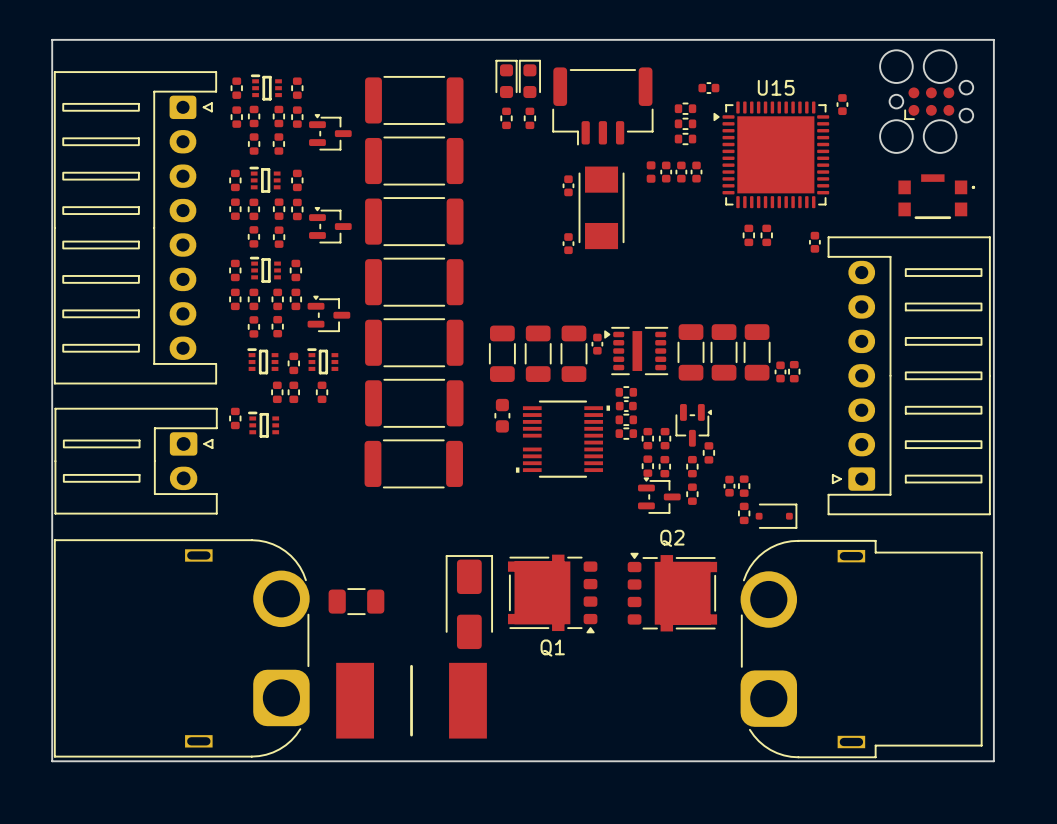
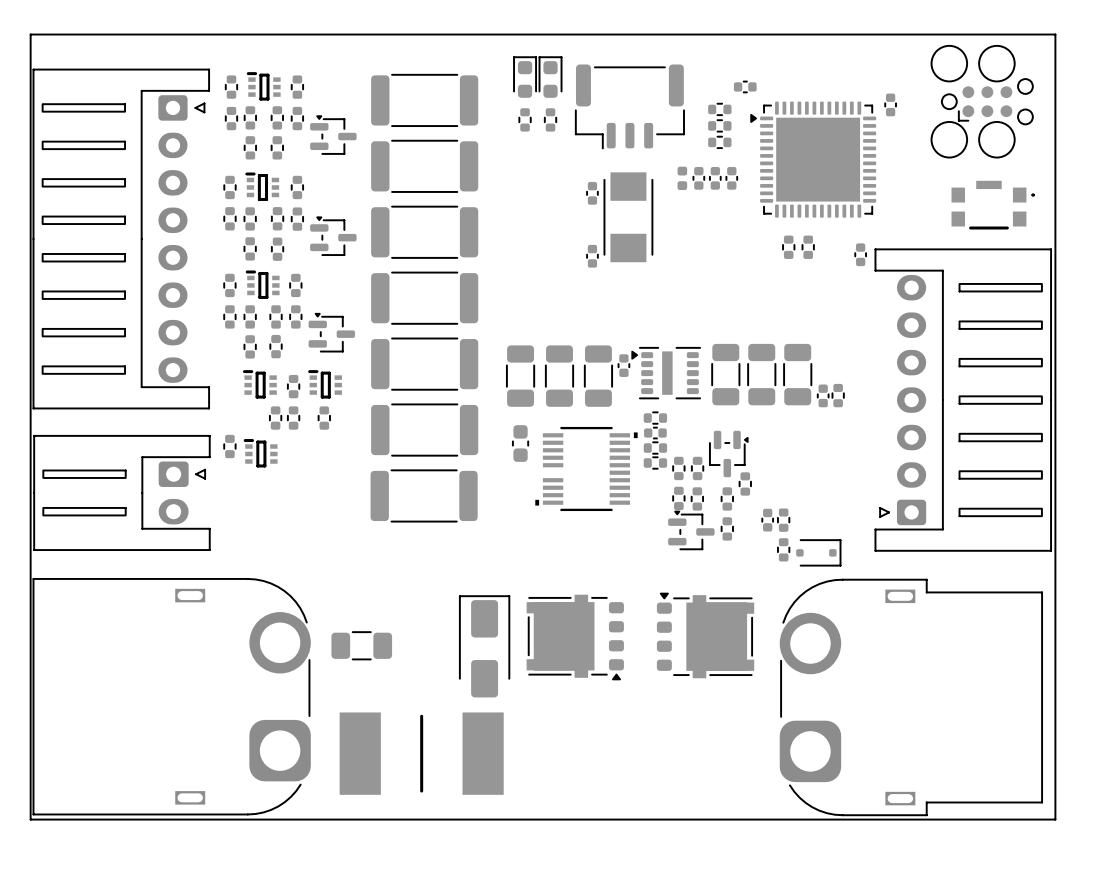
U15 name: U15 (776, 87) -> none
Q2 name: Q2 (672, 538) -> none
Q1 name: Q1 (552, 648) -> none

